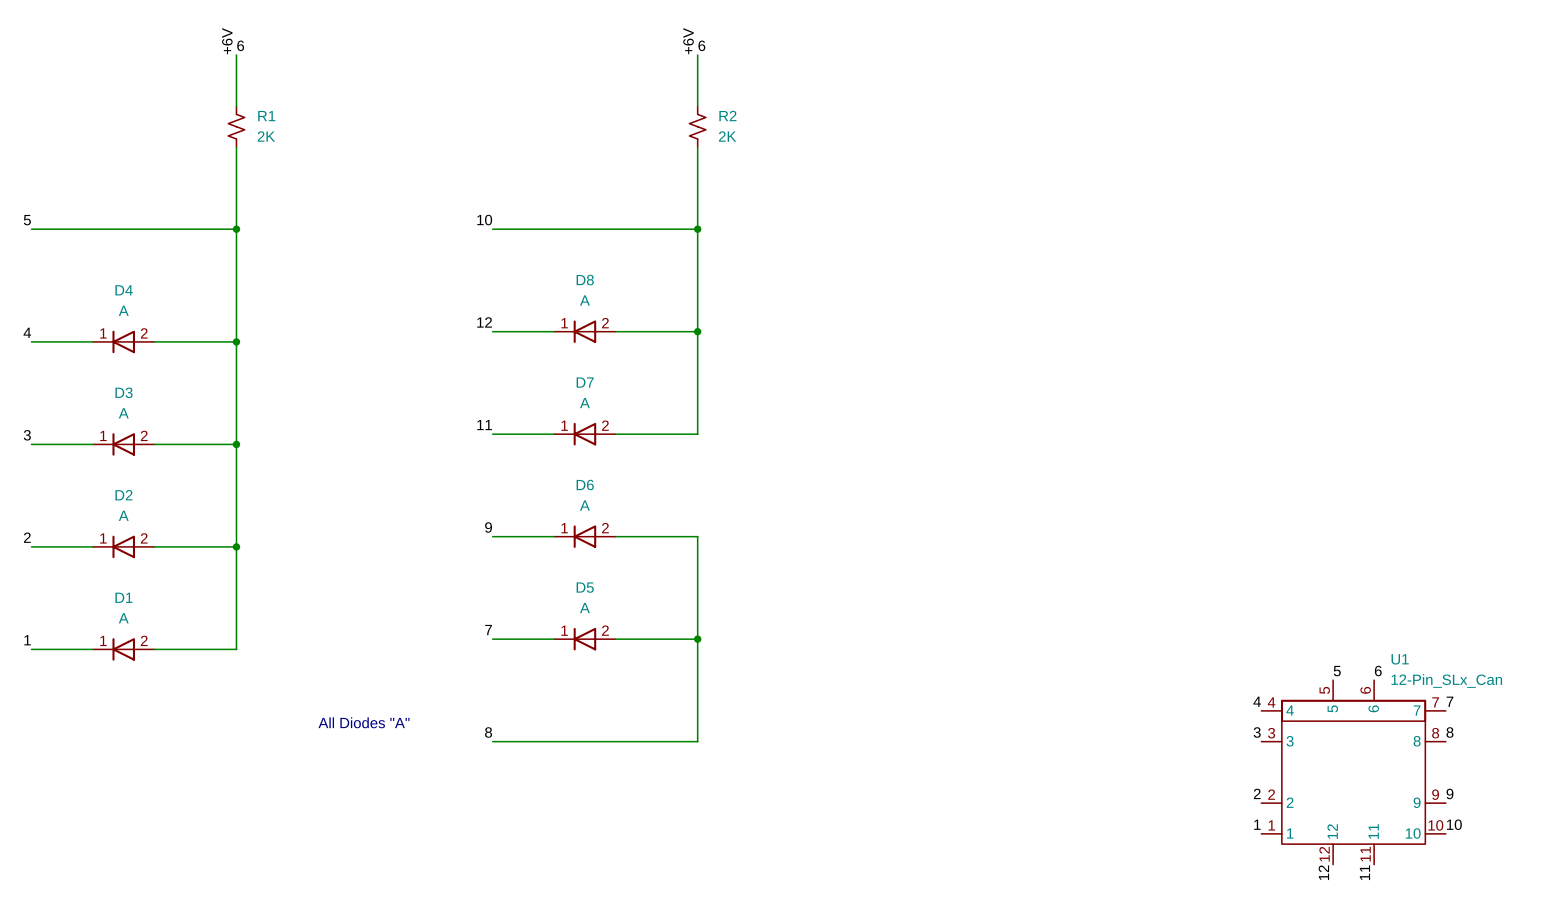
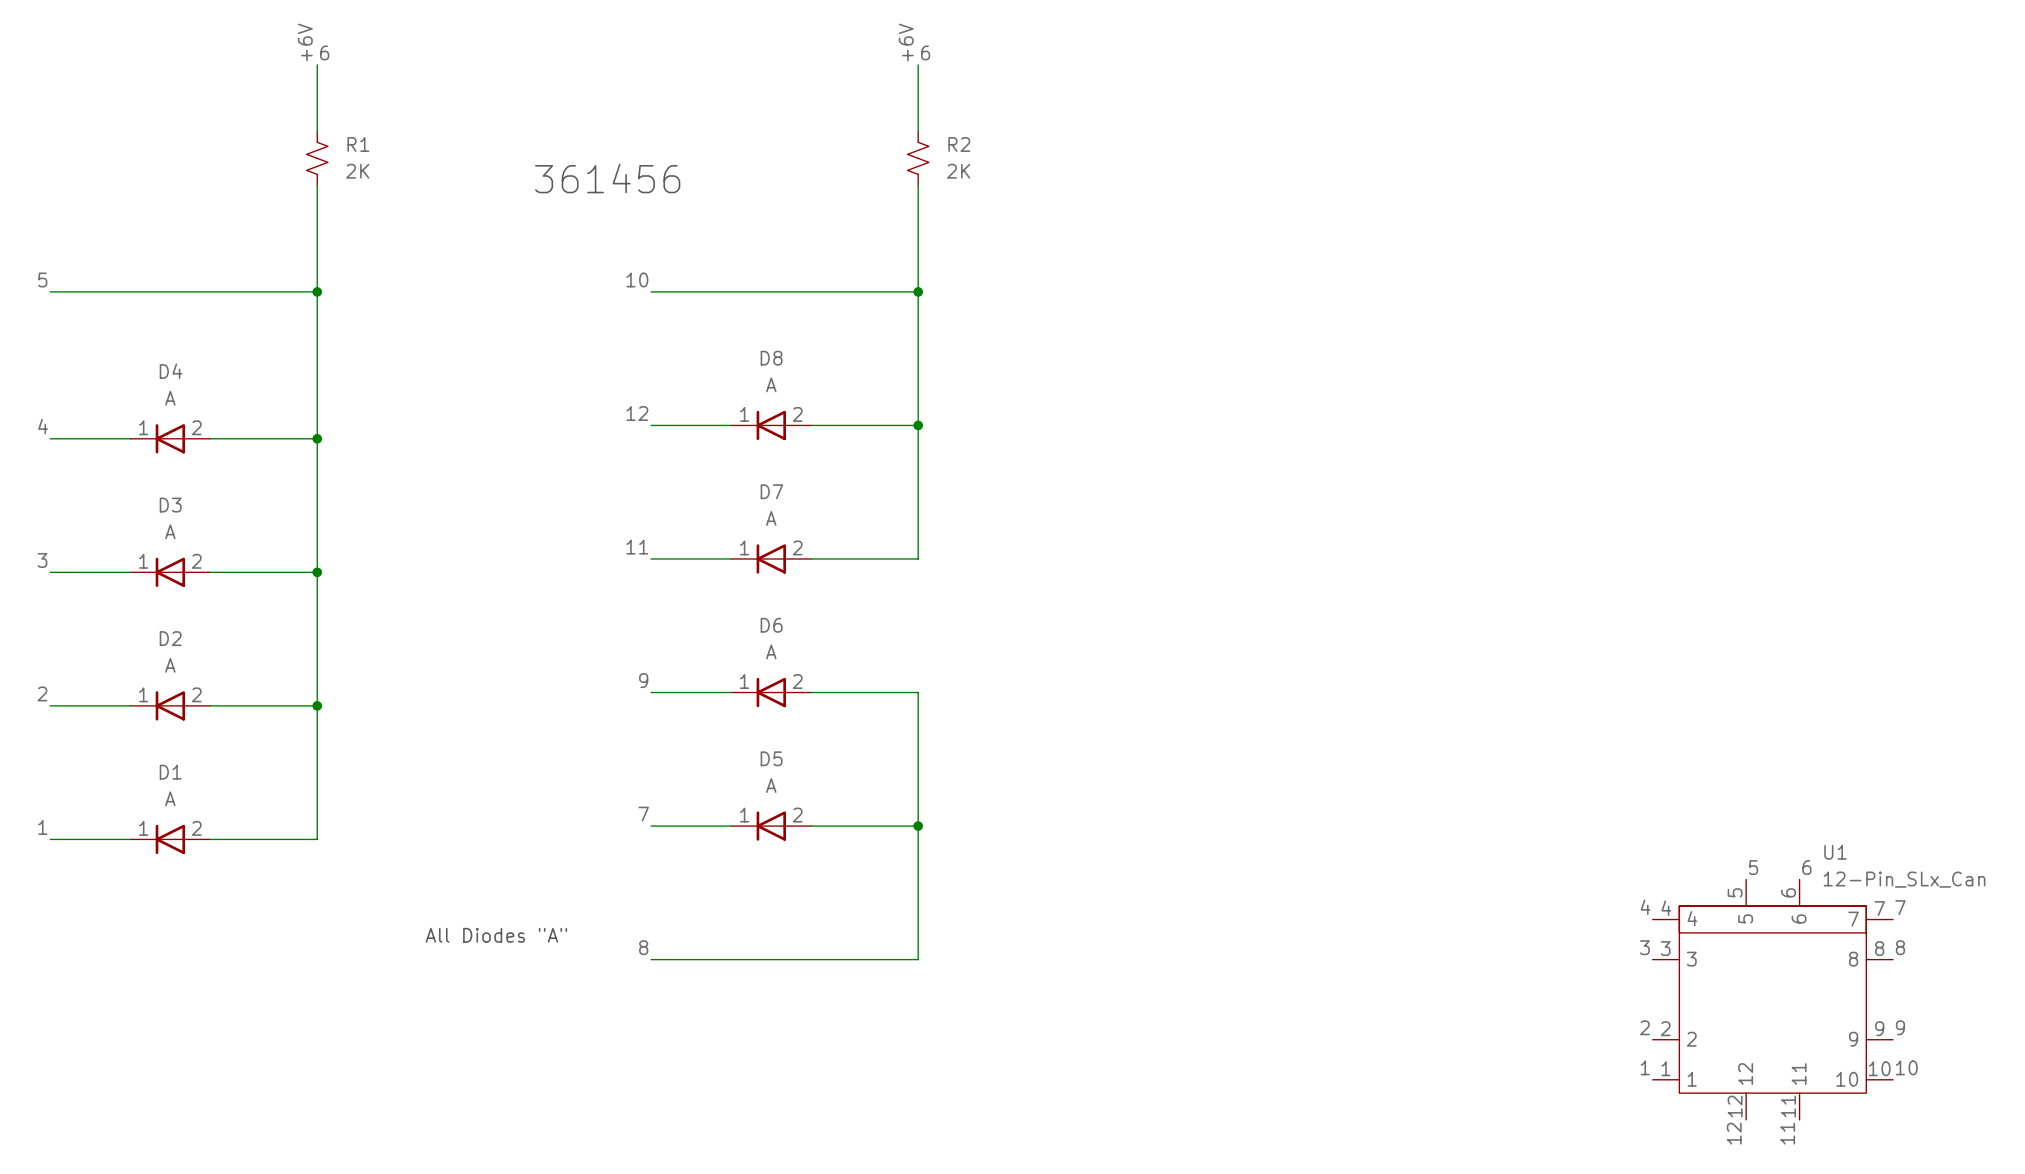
text: none -> 361456 (607, 178)

